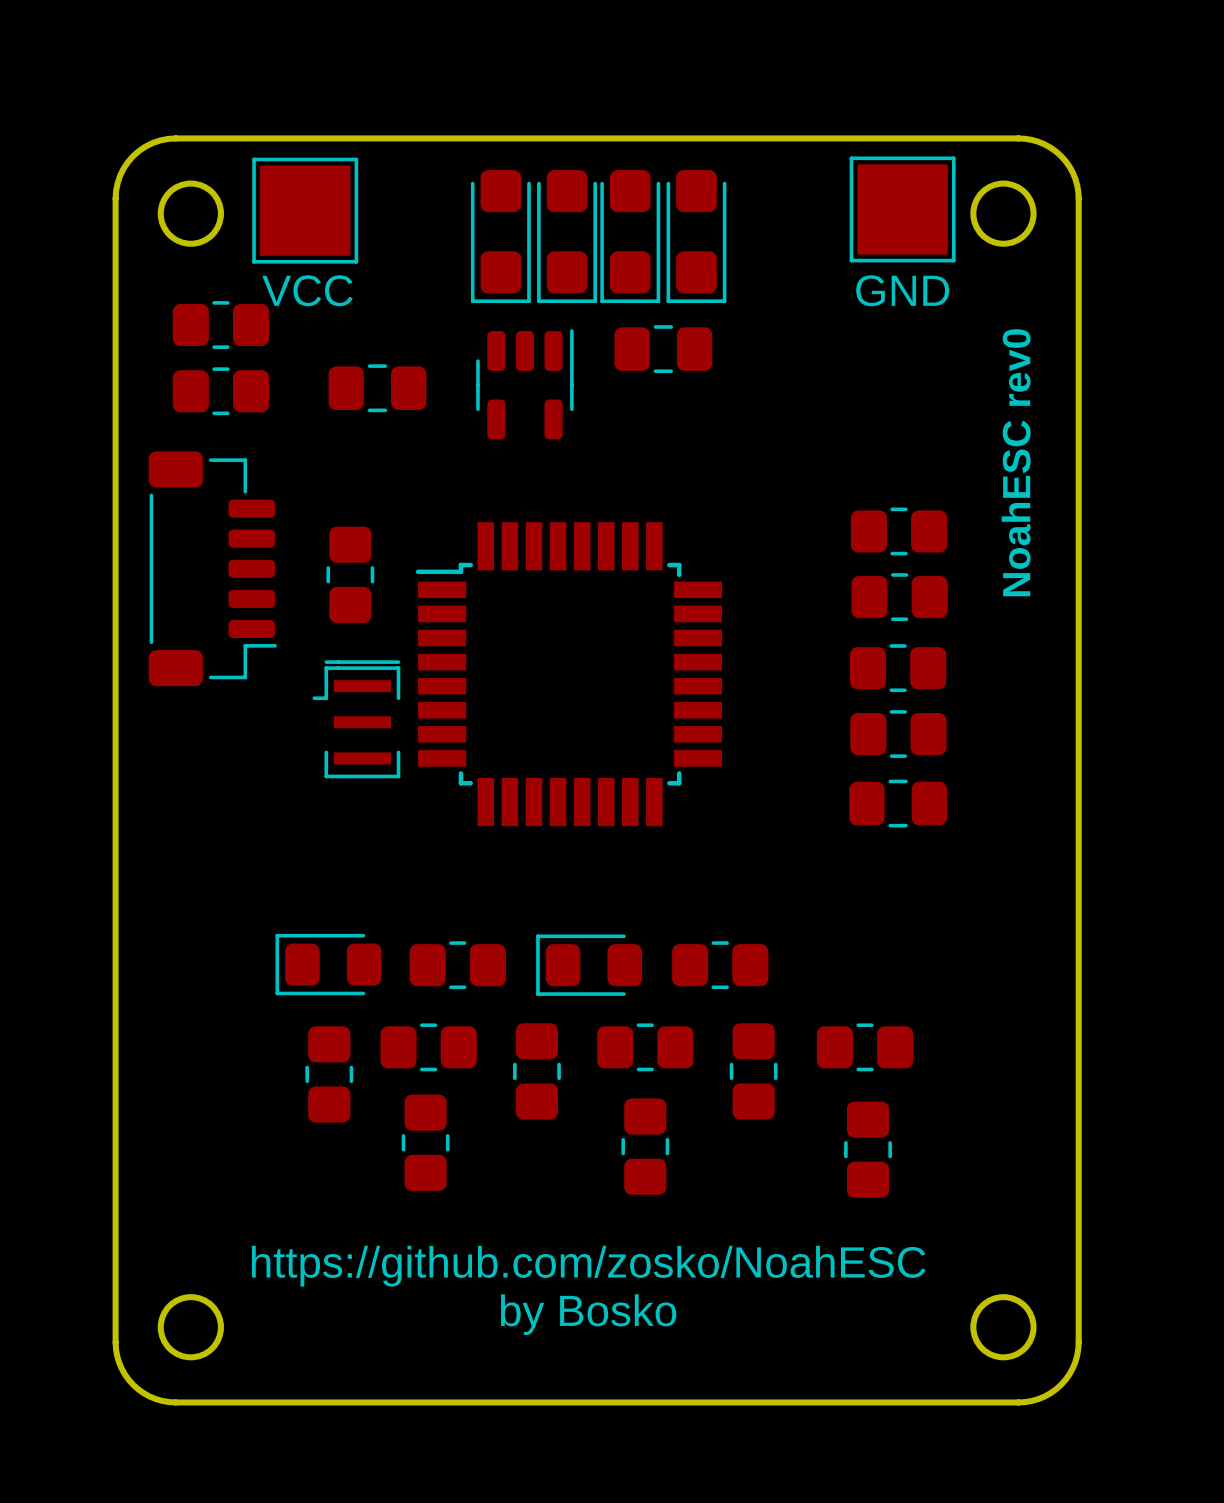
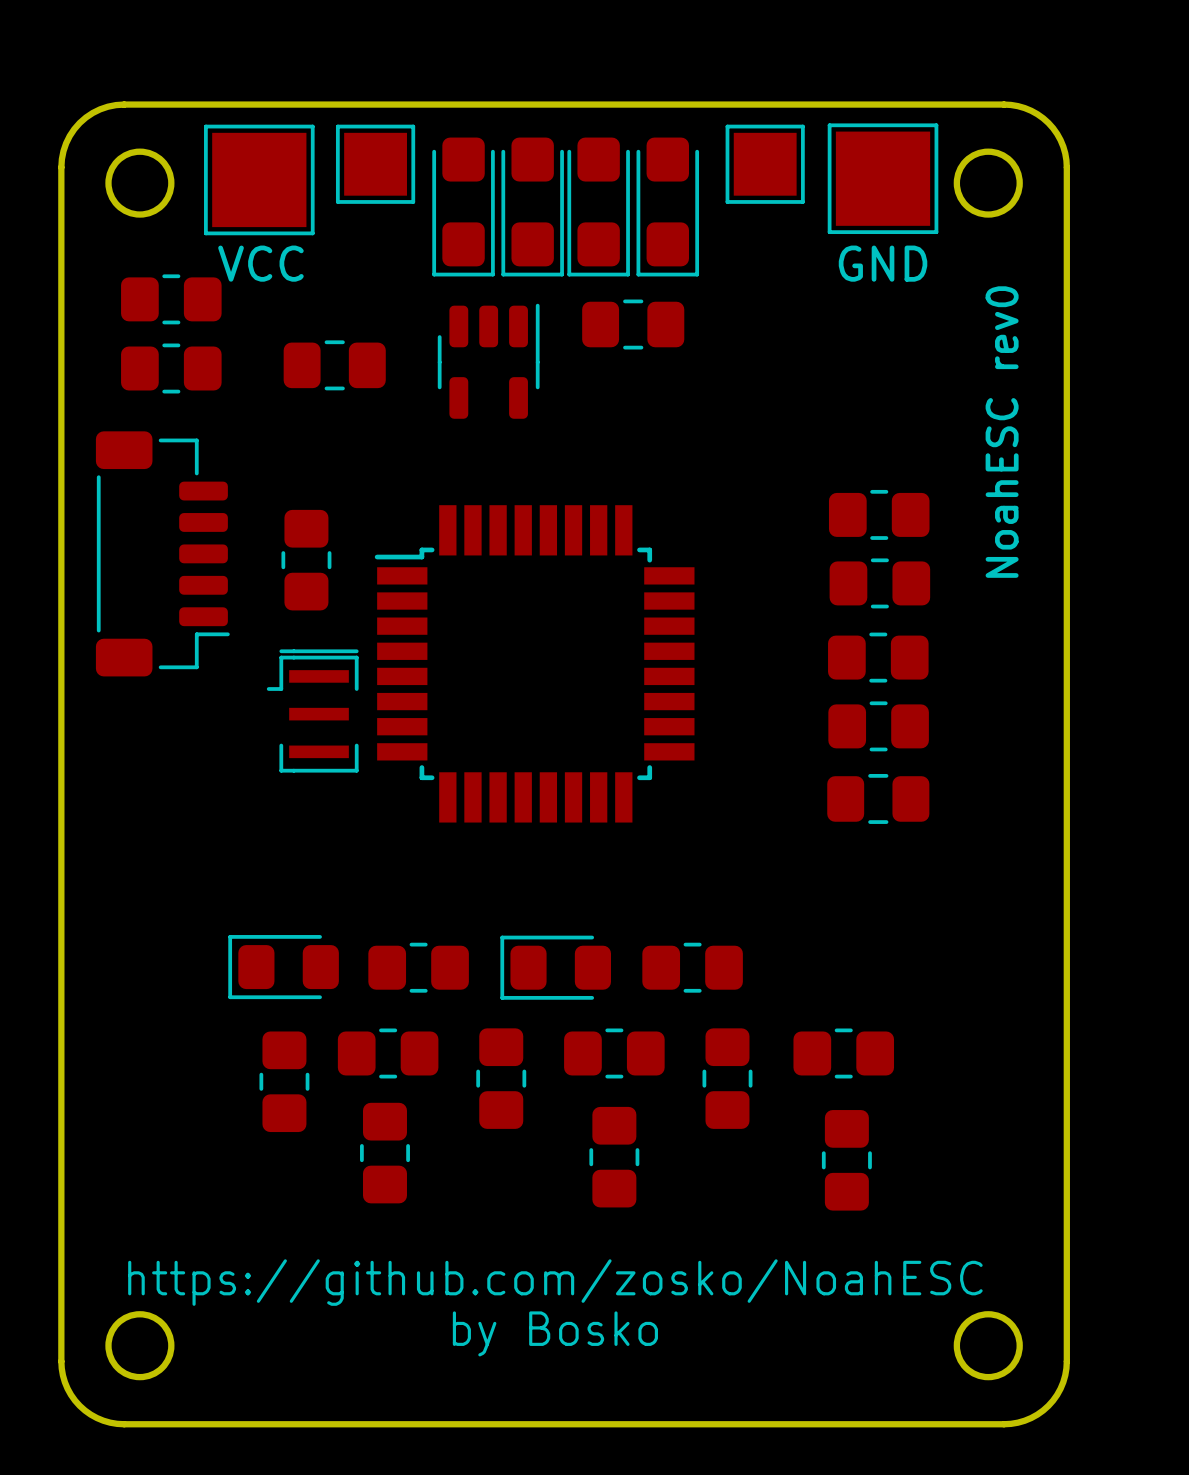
part: none -> (375, 164)
part: none -> (765, 164)

